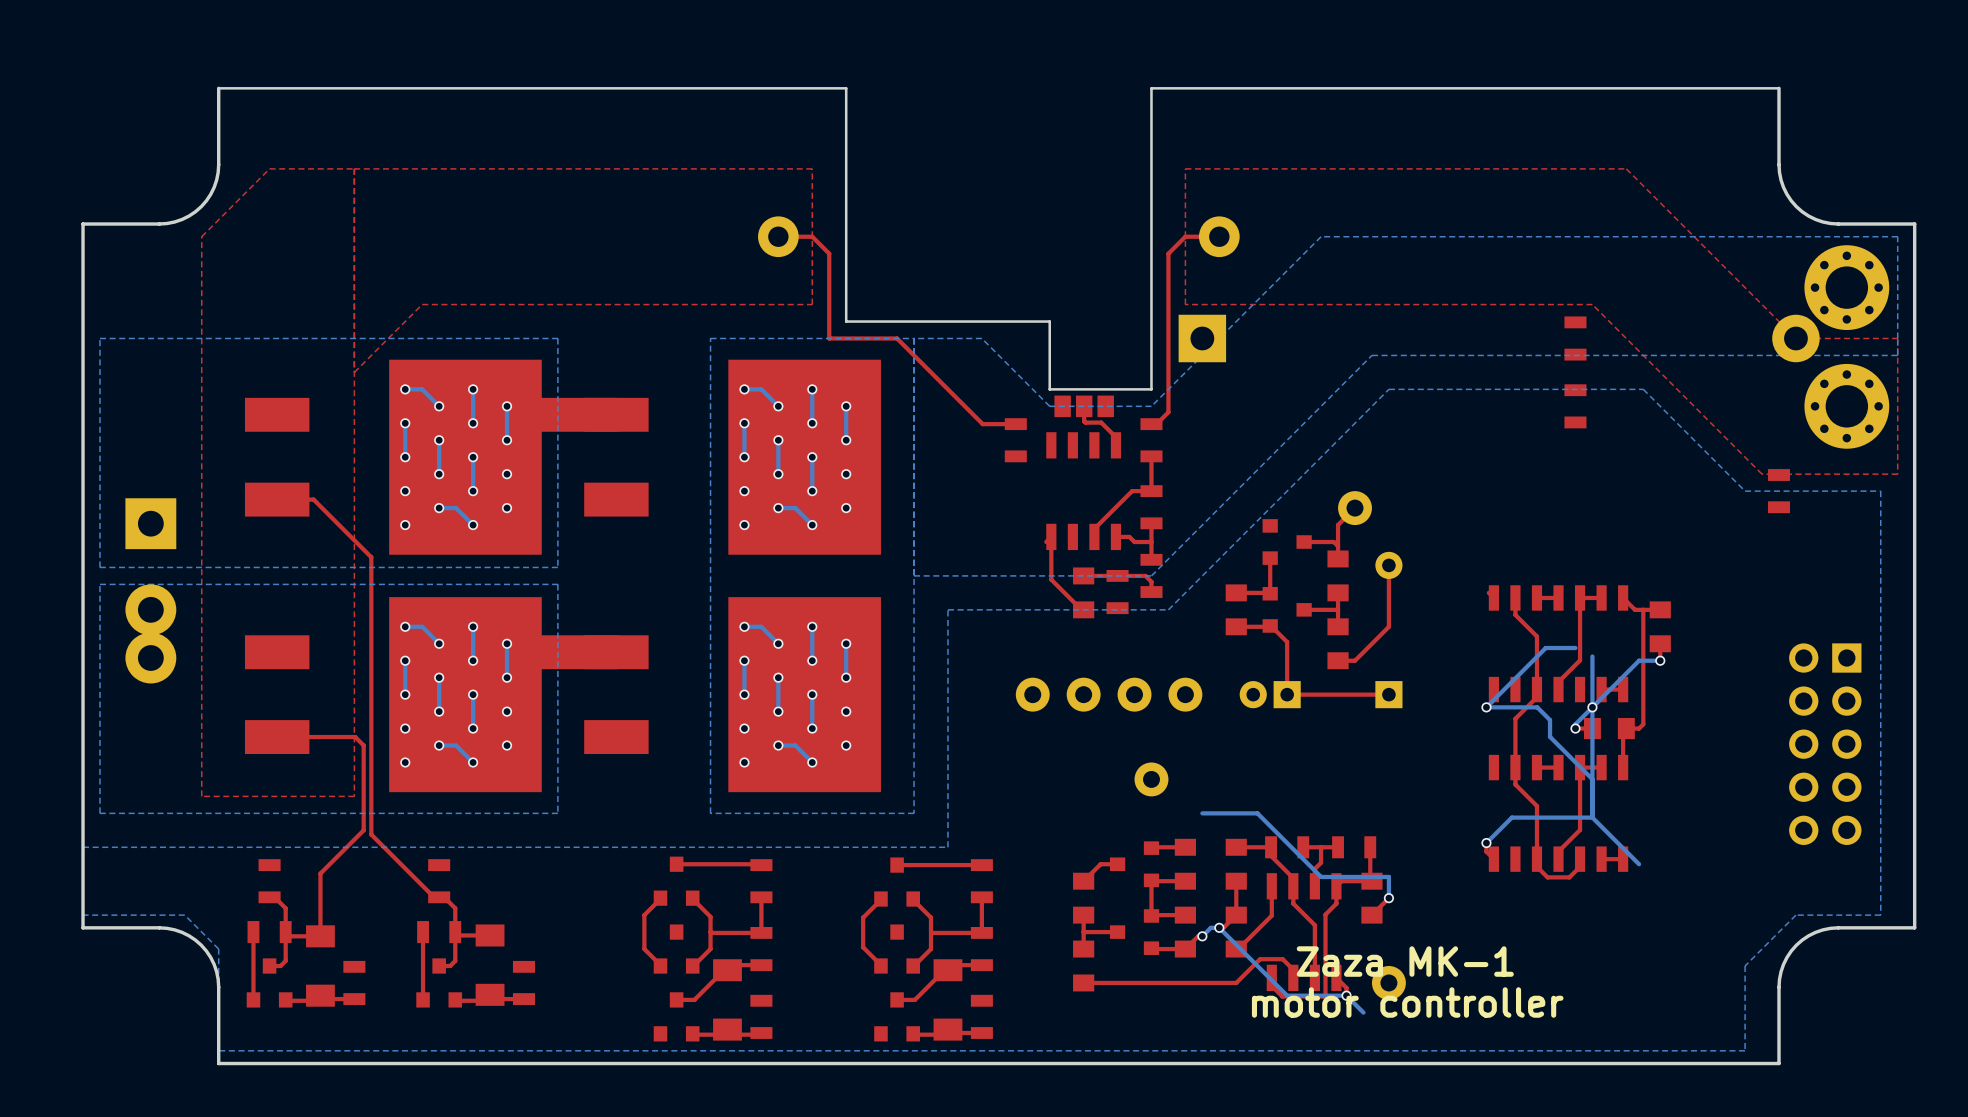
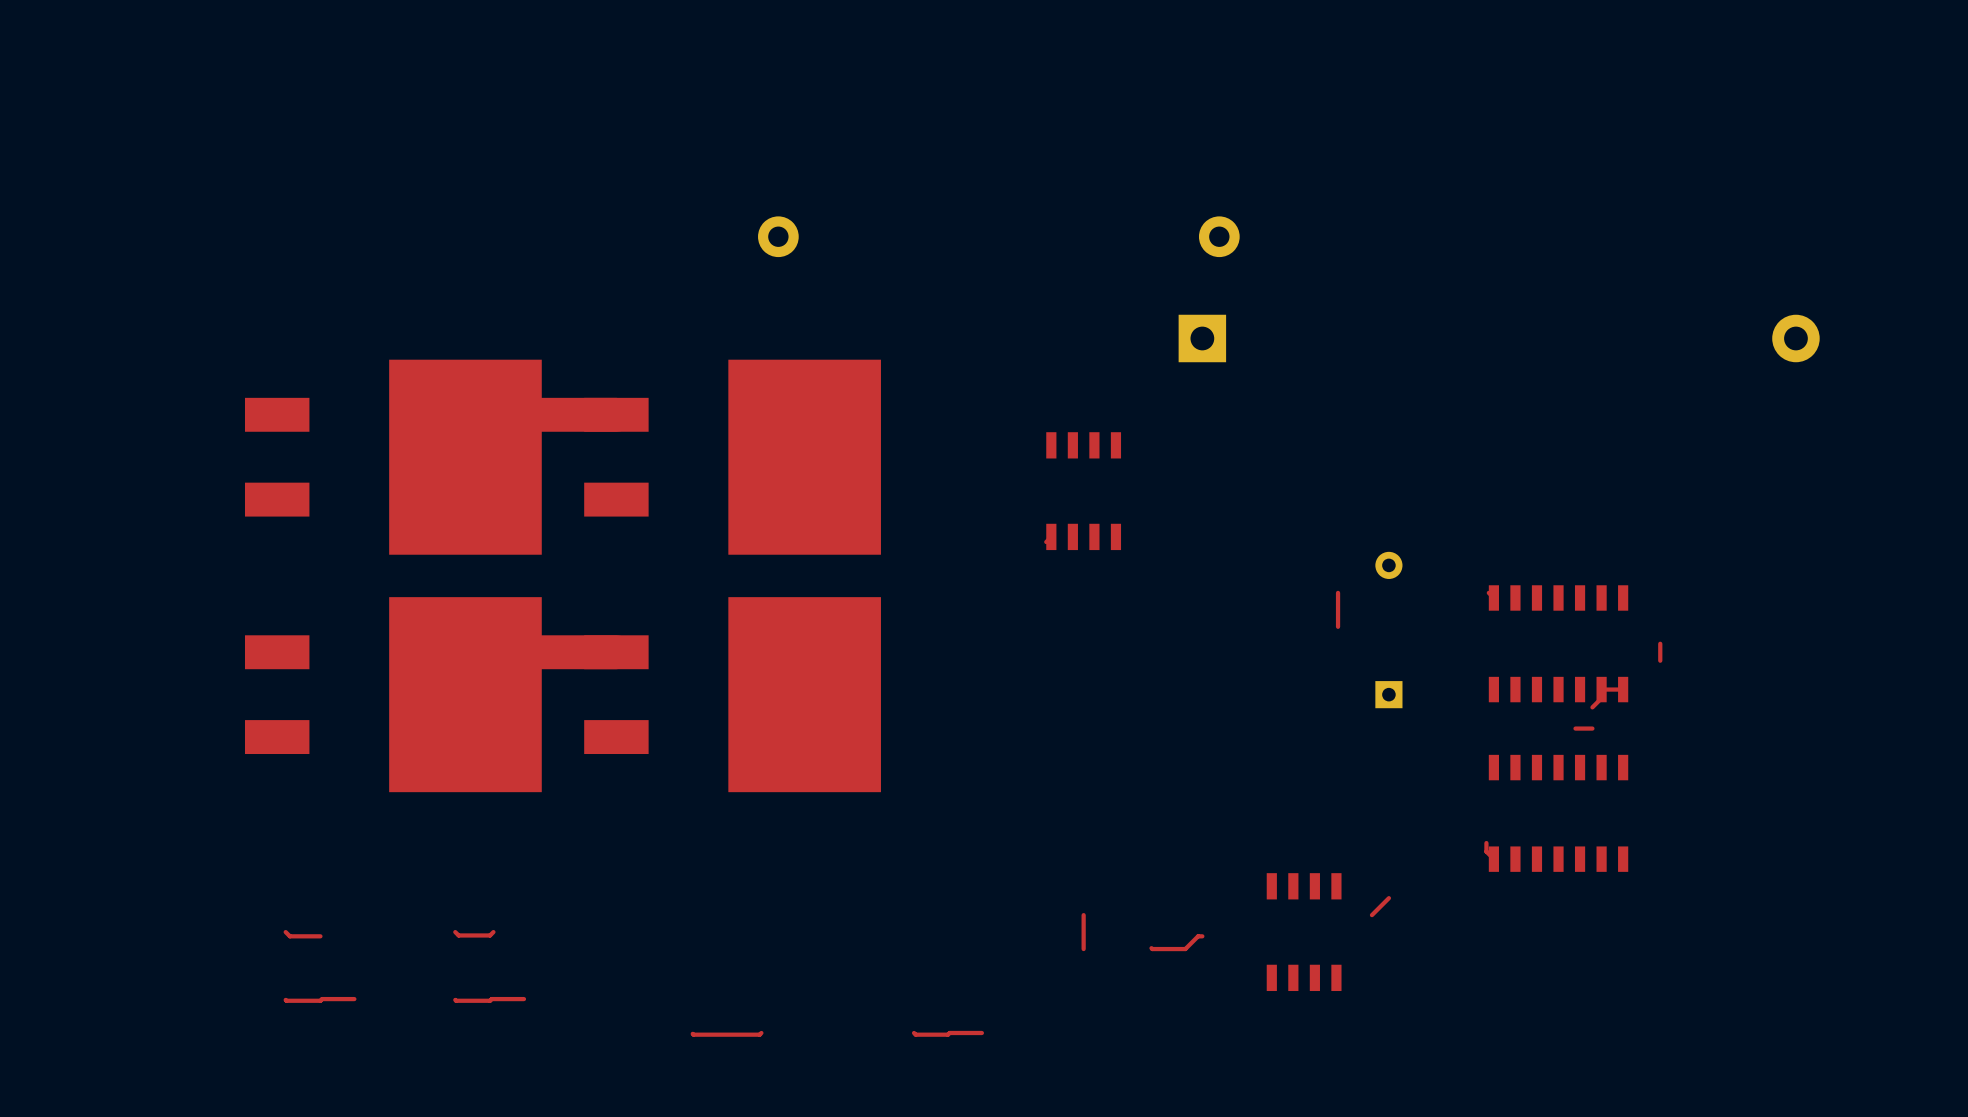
board edge: (1778, 88) (1151, 88) (1151, 389) (1049, 389) (1049, 321) (846, 321) (846, 88) (218, 88) (218, 172) (210, 194) (201, 206) (189, 216) (167, 223) (83, 224) (83, 927) (167, 928) (189, 935) (201, 945) (210, 957) (218, 979) (218, 1063) (1778, 1063) (1779, 979) (1786, 957) (1796, 945) (1808, 935) (1830, 928) (1914, 927) (1914, 224) (1830, 223) (1808, 216) (1796, 206) (1786, 194) (1779, 172) (1778, 88) -> none
top zone outline: (354, 168) (354, 796) (201, 796) (201, 236) (269, 168) (812, 168) (812, 304) (422, 304) (354, 372) -> none
top zone outline: (1626, 168) (1185, 168) (1185, 304) (1592, 304) (1762, 474) (1897, 474) (1897, 338) (1795, 338) (1626, 168) -> none
top track: (778, 236) (812, 236) (829, 253) (829, 338) (897, 338) (982, 424) (1015, 424) -> none
top track: (1219, 236) (1185, 236) (1168, 253) (1168, 412) (1156, 424) (1151, 424) -> none
part: (1846, 287) -> none
bottom zone outline: (557, 338) (99, 338) (99, 567) (557, 567) (557, 338) -> none
bottom zone outline: (914, 338) (914, 813) (710, 813) (710, 338) (981, 338) (1049, 406) (1151, 406) (1321, 236) (1897, 236) (1897, 355) (1371, 355) (1151, 575) (914, 575) -> none
part: (1575, 338) -> none
bottom track: (405, 389) (422, 389) (439, 406) -> none
via: (405, 389) -> none
bottom track: (473, 389) (473, 423) -> none
via: (473, 389) -> none
bottom track: (744, 389) (761, 389) (778, 406) -> none
via: (744, 389) -> none
bottom track: (812, 389) (812, 423) -> none
via: (812, 389) -> none
bottom zone outline: (1643, 389) (1388, 389) (1168, 609) (947, 609) (947, 847) (83, 847) (83, 915) (184, 915) (218, 949) (218, 1050) (1745, 1050) (1745, 966) (1795, 915) (1880, 915) (1880, 491) (1745, 491) (1643, 389) -> none
via: (439, 406) -> none
bottom track: (507, 406) (507, 440) -> none
via: (507, 406) -> none
via: (778, 406) -> none
bottom track: (846, 406) (846, 440) -> none
via: (846, 406) -> none
top track: (1084, 406) (1084, 421) (1101, 422) (1115, 437) (1115, 445) -> none
part: (1084, 406) -> none
part: (1575, 406) -> none
part: (1846, 406) -> none
bottom track: (405, 423) (405, 457) -> none
via: (405, 423) -> none
via: (473, 423) -> none
bottom track: (744, 423) (744, 457) -> none
via: (744, 423) -> none
via: (812, 423) -> none
bottom track: (439, 440) (439, 474) -> none
via: (439, 440) -> none
via: (507, 440) -> none
bottom track: (778, 440) (778, 474) -> none
via: (778, 440) -> none
via: (846, 440) -> none
part: (1015, 440) -> none
part: (1151, 440) -> none
top track: (1151, 456) (1151, 491) (1132, 491) (1094, 528) (1094, 536) -> none
via: (405, 457) -> none
bottom track: (473, 457) (473, 491) -> none
via: (473, 457) -> none
via: (744, 457) -> none
bottom track: (812, 457) (812, 491) -> none
via: (812, 457) -> none
via: (439, 474) -> none
via: (507, 474) -> none
via: (778, 474) -> none
via: (846, 474) -> none
via: (405, 491) -> none
via: (473, 491) -> none
via: (744, 491) -> none
via: (812, 491) -> none
part: (1778, 491) -> none
top track: (277, 499) (313, 499) (371, 557) (371, 834) (434, 897) (444, 897) (455, 908) (455, 960) (450, 966) (439, 966) -> none
part: (1151, 507) -> none
bottom track: (439, 508) (456, 508) (473, 525) -> none
via: (439, 508) -> none
via: (507, 508) -> none
bottom track: (778, 508) (795, 508) (812, 525) -> none
via: (778, 508) -> none
via: (846, 508) -> none
top track: (1355, 508) (1338, 525) (1338, 558) -> none
part: (1355, 508) -> none
top track: (1151, 523) (1151, 559) -> none
via: (405, 525) -> none
via: (473, 525) -> none
via: (744, 525) -> none
via: (812, 525) -> none
top track: (1115, 526) (1115, 536) (1129, 536) (1134, 542) (1151, 542) -> none
top track: (1051, 528) (1051, 579) (1083, 609) -> none
part: (1287, 542) -> none
top track: (1304, 542) (1333, 542) (1338, 546) -> none
top track: (1270, 558) (1270, 593) (1236, 592) -> none
top track: (1388, 565) (1388, 626) (1355, 660) (1338, 660) -> none
top track: (1083, 575) (1145, 575) (1151, 581) (1151, 592) -> none
part: (1151, 575) -> none
part: (1338, 575) -> none
bottom zone outline: (557, 584) (557, 813) (99, 813) (99, 584) (557, 584) -> none
part: (150, 590) -> none
part: (1083, 592) -> none
part: (1117, 592) -> none
top track: (1515, 597) (1515, 614) (1536, 636) (1536, 697) (1515, 718) (1515, 784) (1536, 806) (1536, 866) (1547, 877) (1569, 877) (1580, 866) (1580, 859) -> none
top track: (1558, 597) (1536, 597) -> none
top track: (1601, 597) (1580, 597) (1580, 660) (1558, 681) (1558, 689) -> none
top track: (1623, 597) (1635, 609) (1660, 609) -> none
part: (1236, 609) -> none
part: (1287, 609) -> none
top track: (1338, 609) (1304, 609) -> none
top track: (1643, 609) (1643, 724) (1639, 728) (1626, 728) (1623, 731) (1623, 767) -> none
bottom track: (405, 626) (422, 626) (439, 643) -> none
via: (405, 626) -> none
bottom track: (473, 626) (473, 660) -> none
via: (473, 626) -> none
bottom track: (744, 626) (761, 626) (778, 643) -> none
via: (744, 626) -> none
bottom track: (812, 626) (812, 660) -> none
via: (812, 626) -> none
top track: (1236, 626) (1271, 625) (1287, 642) (1287, 694) (1388, 694) -> none
part: (1660, 626) -> none
via: (439, 643) -> none
bottom track: (507, 643) (507, 677) -> none
via: (507, 643) -> none
via: (778, 643) -> none
bottom track: (846, 643) (846, 677) -> none
via: (846, 643) -> none
part: (1338, 643) -> none
bottom track: (1575, 648) (1545, 648) (1486, 707) (1537, 707) (1550, 720) (1550, 736) (1592, 779) -> none
bottom track: (1592, 656) (1592, 817) -> none
bottom track: (405, 660) (405, 694) -> none
via: (405, 660) -> none
via: (473, 660) -> none
bottom track: (744, 660) (744, 694) -> none
via: (744, 660) -> none
via: (812, 660) -> none
bottom track: (1660, 660) (1639, 660) (1575, 724) (1575, 728) -> none
via: (1660, 660) -> none
bottom track: (439, 677) (439, 711) -> none
via: (439, 677) -> none
via: (507, 677) -> none
bottom track: (778, 677) (778, 711) -> none
via: (778, 677) -> none
via: (846, 677) -> none
via: (405, 694) -> none
bottom track: (473, 694) (473, 728) -> none
via: (473, 694) -> none
via: (744, 694) -> none
bottom track: (812, 694) (812, 728) -> none
via: (812, 694) -> none
part: (1032, 694) -> none
part: (1083, 694) -> none
part: (1134, 694) -> none
part: (1185, 694) -> none
part: (1270, 694) -> none
via: (1486, 707) -> none
via: (1592, 707) -> none
via: (439, 711) -> none
via: (507, 711) -> none
via: (778, 711) -> none
via: (846, 711) -> none
via: (405, 728) -> none
via: (473, 728) -> none
via: (744, 728) -> none
via: (812, 728) -> none
via: (1575, 728) -> none
part: (1609, 728) -> none
top track: (277, 737) (355, 737) (363, 745) (363, 830) (320, 873) (320, 936) (323, 939) -> none
part: (1825, 744) -> none
bottom track: (439, 745) (456, 745) (473, 762) -> none
via: (439, 745) -> none
via: (507, 745) -> none
bottom track: (778, 745) (795, 745) (812, 762) -> none
via: (778, 745) -> none
via: (846, 745) -> none
top track: (1601, 759) (1601, 767) (1580, 767) (1580, 829) (1558, 851) (1558, 859) -> none
via: (405, 762) -> none
via: (473, 762) -> none
via: (744, 762) -> none
via: (812, 762) -> none
top track: (1558, 767) (1536, 767) -> none
part: (1151, 779) -> none
bottom track: (1202, 813) (1257, 813) (1321, 876) (1388, 876) (1388, 898) -> none
bottom track: (1592, 817) (1511, 817) (1486, 843) -> none
bottom track: (1592, 817) (1639, 864) -> none
via: (1486, 843) -> none
top track: (1185, 847) (1151, 848) -> none
top track: (1236, 847) (1271, 847) (1271, 855) (1293, 878) (1293, 903) (1314, 925) (1314, 977) -> none
part: (1287, 847) -> none
top track: (1321, 847) (1321, 862) (1314, 868) (1314, 886) -> none
top track: (1338, 847) (1303, 847) -> none
part: (1354, 847) -> none
top track: (1370, 847) (1370, 879) (1371, 881) (1341, 881) (1336, 886) -> none
top track: (1623, 859) (1601, 859) -> none
top track: (676, 864) (761, 865) (756, 865) -> none
top track: (1117, 864) (1100, 864) (1083, 881) -> none
part: (1134, 864) -> none
part: (1185, 864) -> none
part: (1236, 864) -> none
top track: (981, 865) (897, 865) -> none
part: (269, 881) -> none
part: (439, 881) -> none
part: (676, 881) -> none
part: (761, 881) -> none
part: (981, 881) -> none
top track: (1185, 881) (1151, 880) (1151, 915) (1185, 915) -> none
top track: (1236, 881) (1236, 915) (1223, 927) (1219, 927) -> none
part: (897, 882) -> none
top track: (1271, 886) (1271, 915) (1236, 949) -> none
top track: (1336, 886) (1336, 903) (1325, 914) (1325, 995) (1282, 996) (1271, 985) (1271, 969) -> none
top track: (269, 897) (274, 897) (285, 908) (285, 960) (280, 966) (269, 966) -> none
top track: (761, 897) (761, 932) (710, 932) -> none
top track: (981, 897) (981, 932) (931, 932) -> none
top track: (660, 898) (644, 915) (644, 949) (660, 966) -> none
top track: (692, 898) (710, 916) (710, 949) (693, 965) -> none
part: (1083, 898) -> none
part: (1371, 898) -> none
via: (1388, 898) -> none
top track: (880, 899) (863, 917) (863, 947) (880, 966) -> none
top track: (913, 899) (931, 917) (931, 949) (914, 966) -> none
via: (1219, 927) -> none
top track: (253, 932) (252, 999) -> none
part: (269, 932) -> none
top track: (423, 932) (423, 1000) -> none
part: (439, 932) -> none
top track: (1117, 932) (1083, 932) -> none
part: (1134, 932) -> none
part: (1185, 932) -> none
part: (1236, 932) -> none
bottom track: (1202, 936) (1210, 927) (1219, 927) (1287, 995) (1346, 995) (1363, 1012) -> none
via: (1202, 936) -> none
part: (676, 949) -> none
part: (761, 949) -> none
part: (897, 949) -> none
part: (981, 949) -> none
text: Zaza MK-1 (1405, 961) -> none
part: (490, 965) -> none
top track: (761, 965) (732, 965) (727, 970) (724, 970) (694, 999) (677, 999) -> none
top track: (981, 965) (953, 965) (947, 970) (944, 970) (914, 999) (897, 999) -> none
part: (320, 966) -> none
part: (1083, 966) -> none
top track: (1336, 977) (1346, 987) (1346, 995) -> none
part: (269, 982) -> none
part: (354, 982) -> none
part: (439, 982) -> none
part: (523, 982) -> none
top track: (1081, 982) (1236, 982) (1260, 959) (1282, 959) (1293, 969) (1293, 985) -> none
part: (1388, 982) -> none
via: (1346, 995) -> none
part: (727, 999) -> none
part: (947, 999) -> none
text: motor controller (1407, 1002) -> none
part: (676, 1016) -> none
part: (761, 1016) -> none
part: (897, 1016) -> none
part: (981, 1016) -> none

